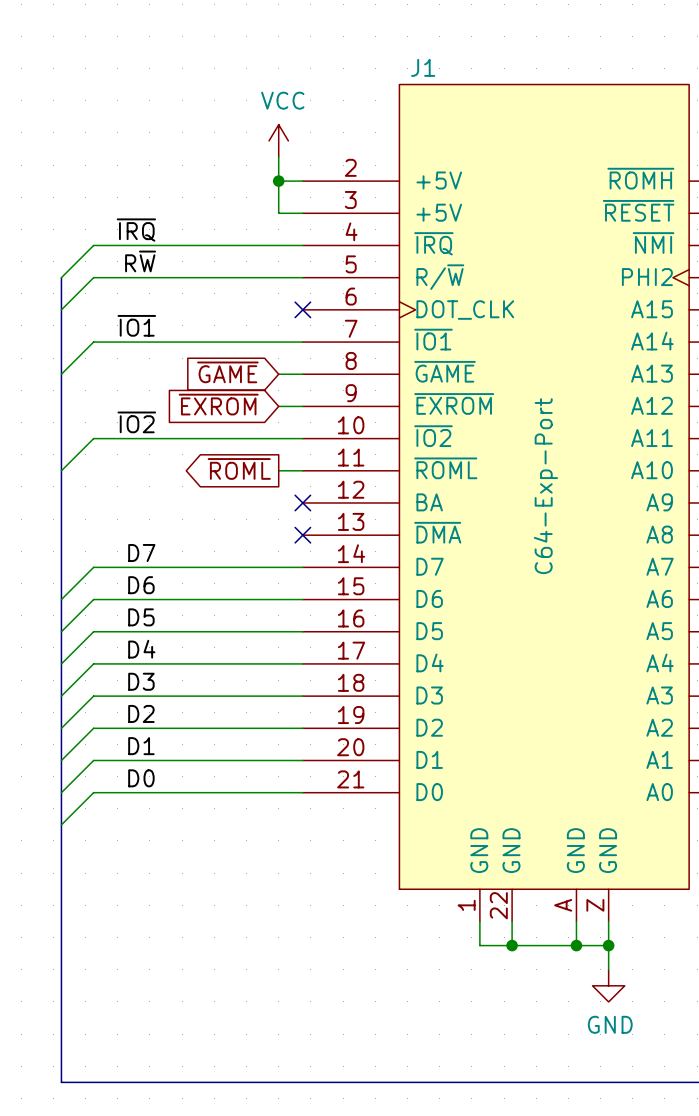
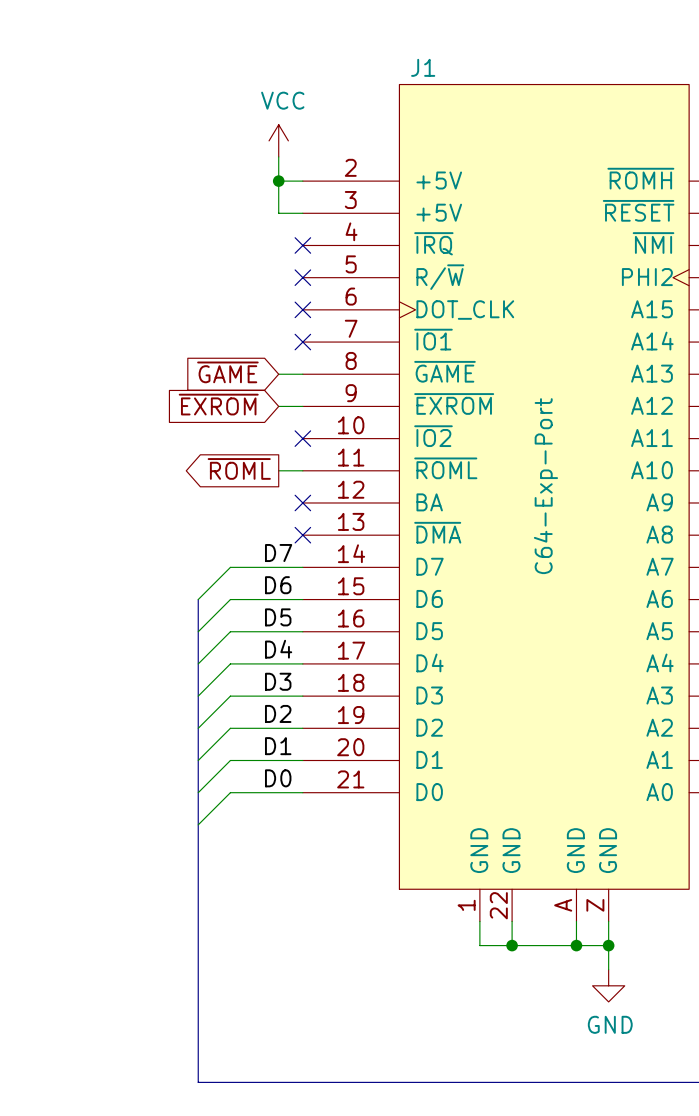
label: ~{IRQ} (136, 230) -> none
wire: (302, 245) (93, 245) (61, 277) -> none
no-connect mark: none -> (302, 245)
label: R~{W} (140, 261) -> none
bus: (61, 277) (61, 1082) (198, 1082) -> (198, 599) (198, 1082)
wire: (302, 277) (93, 277) (61, 309) -> none
no-connect mark: none -> (302, 277)
label: ~{IO1} (136, 325) -> none
wire: (302, 342) (93, 342) (61, 374) -> none
no-connect mark: none -> (302, 342)
label: ~{IO2} (136, 422) -> none
wire: (302, 438) (93, 438) (61, 470) -> none
no-connect mark: none -> (302, 438)
label position: D7 (141, 553) -> D7 (278, 553)
wire: (230, 567) (93, 567) (61, 599) -> (230, 567) (198, 599)
label position: D6 (141, 585) -> D6 (278, 585)
wire: (230, 599) (93, 599) (61, 631) -> (230, 599) (198, 631)
label position: D5 (141, 617) -> D5 (278, 617)
wire: (230, 631) (93, 631) (61, 663) -> (230, 631) (198, 663)
label position: D4 (141, 649) -> D4 (278, 649)
wire: (230, 663) (93, 663) (61, 696) -> (230, 663) (198, 696)
label position: D3 (141, 681) -> D3 (278, 681)
wire: (230, 696) (93, 696) (61, 728) -> (230, 696) (198, 728)
label position: D2 (141, 713) -> D2 (278, 713)
wire: (230, 728) (93, 728) (61, 760) -> (230, 728) (198, 760)
label position: D1 (141, 746) -> D1 (278, 746)
wire: (230, 760) (93, 760) (61, 792) -> (230, 760) (198, 792)
label position: D0 (141, 778) -> D0 (278, 778)
wire: (230, 792) (93, 792) (61, 824) -> (230, 792) (198, 824)

